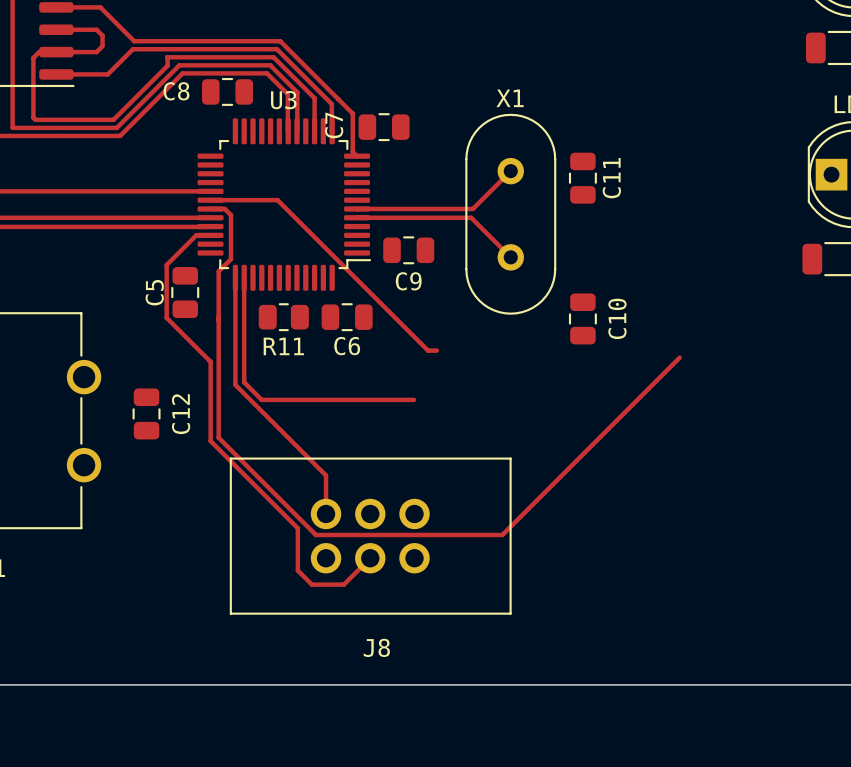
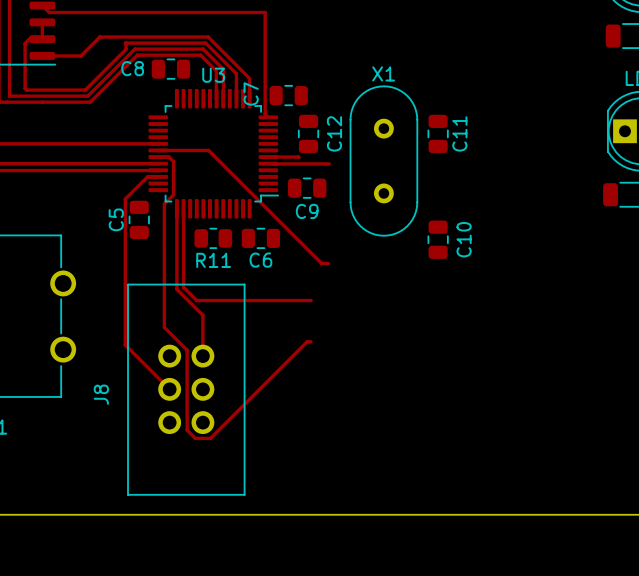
track: (56, 7) (100, 7) (134, 41) (280, 41) (352, 113) -> (42, 5) (49, 12) (265, 12) (265, 85)
track: (56, 29) (96, 29) (102, 35) (102, 44) -> (42, 22) (42, 39)
track: (102, 46) (96, 52) (56, 52) -> none
track: (510, 171) (472, 208) (397, 208) -> (299, 157) (298, 157)
track: (362, 217) (471, 217) (510, 257) -> (272, 163) (329, 163)
track: (166, 317) (210, 361) (210, 441) (297, 528) (297, 570) (311, 584) (343, 584) (370, 558) -> (125, 238) (125, 344) (169, 389)
track: (679, 357) (502, 535) (315, 535) (218, 435) -> (311, 341) (307, 341) (210, 438) (195, 438) (187, 430) (187, 350) (164, 327)
C12 position: (146, 413) -> (308, 133)
track: (269, 419) (326, 475) (326, 513) -> (202, 315) (202, 356)
J8 rotation: 0° (370, 536) -> 90° clockwise (186, 389)

